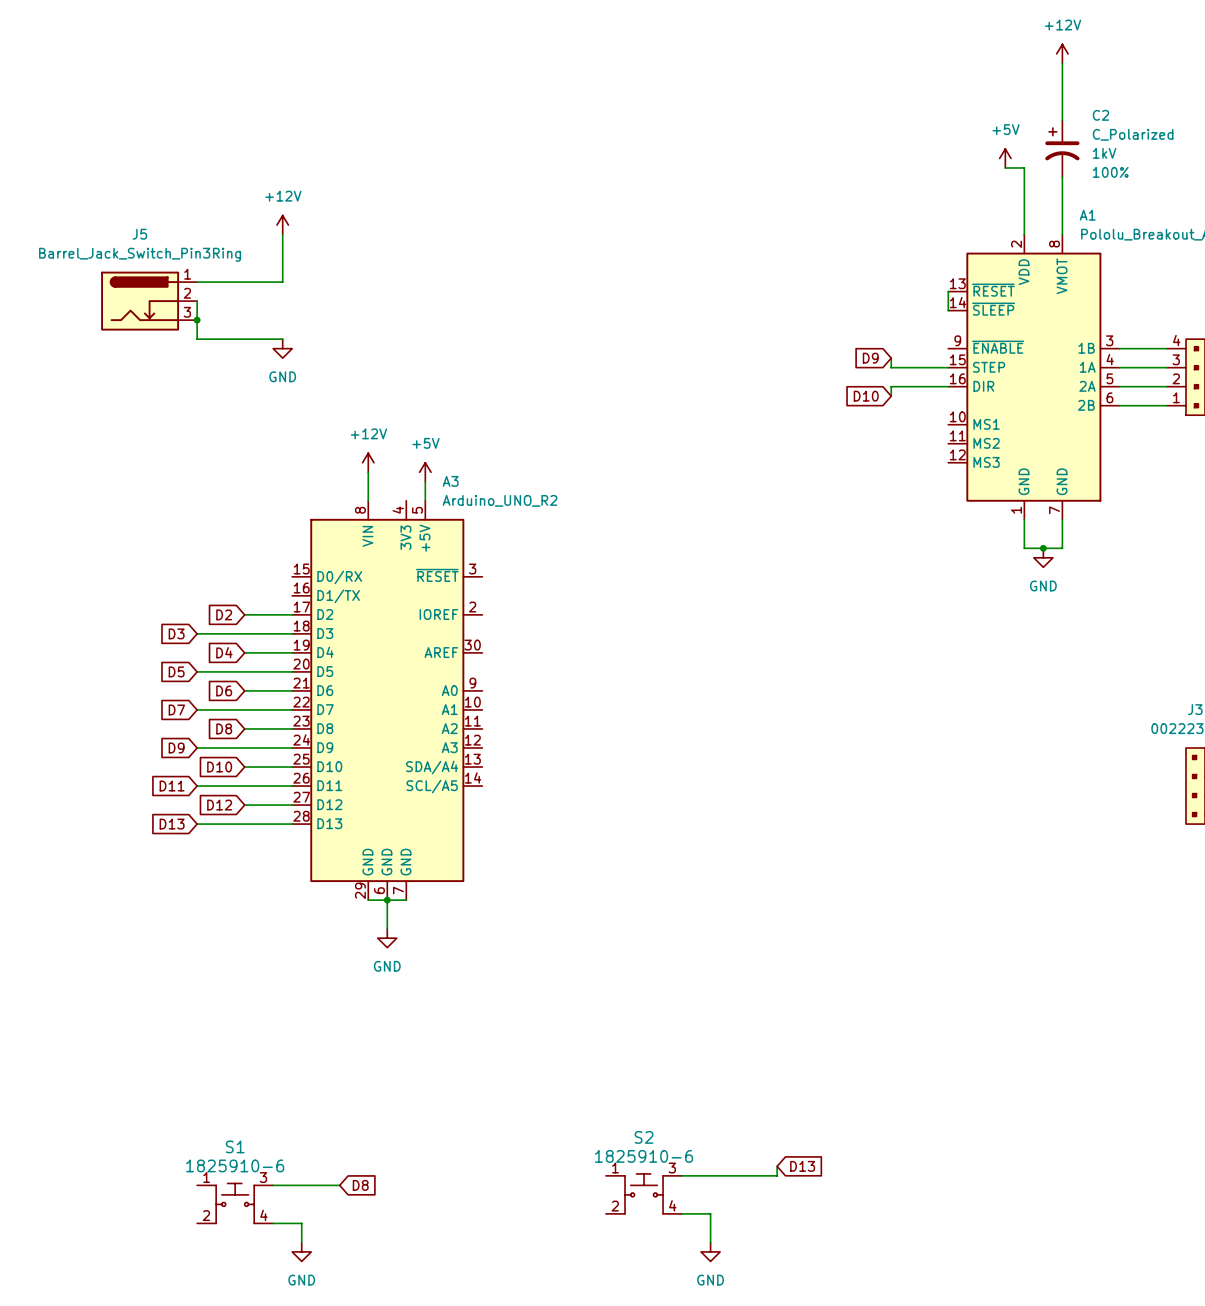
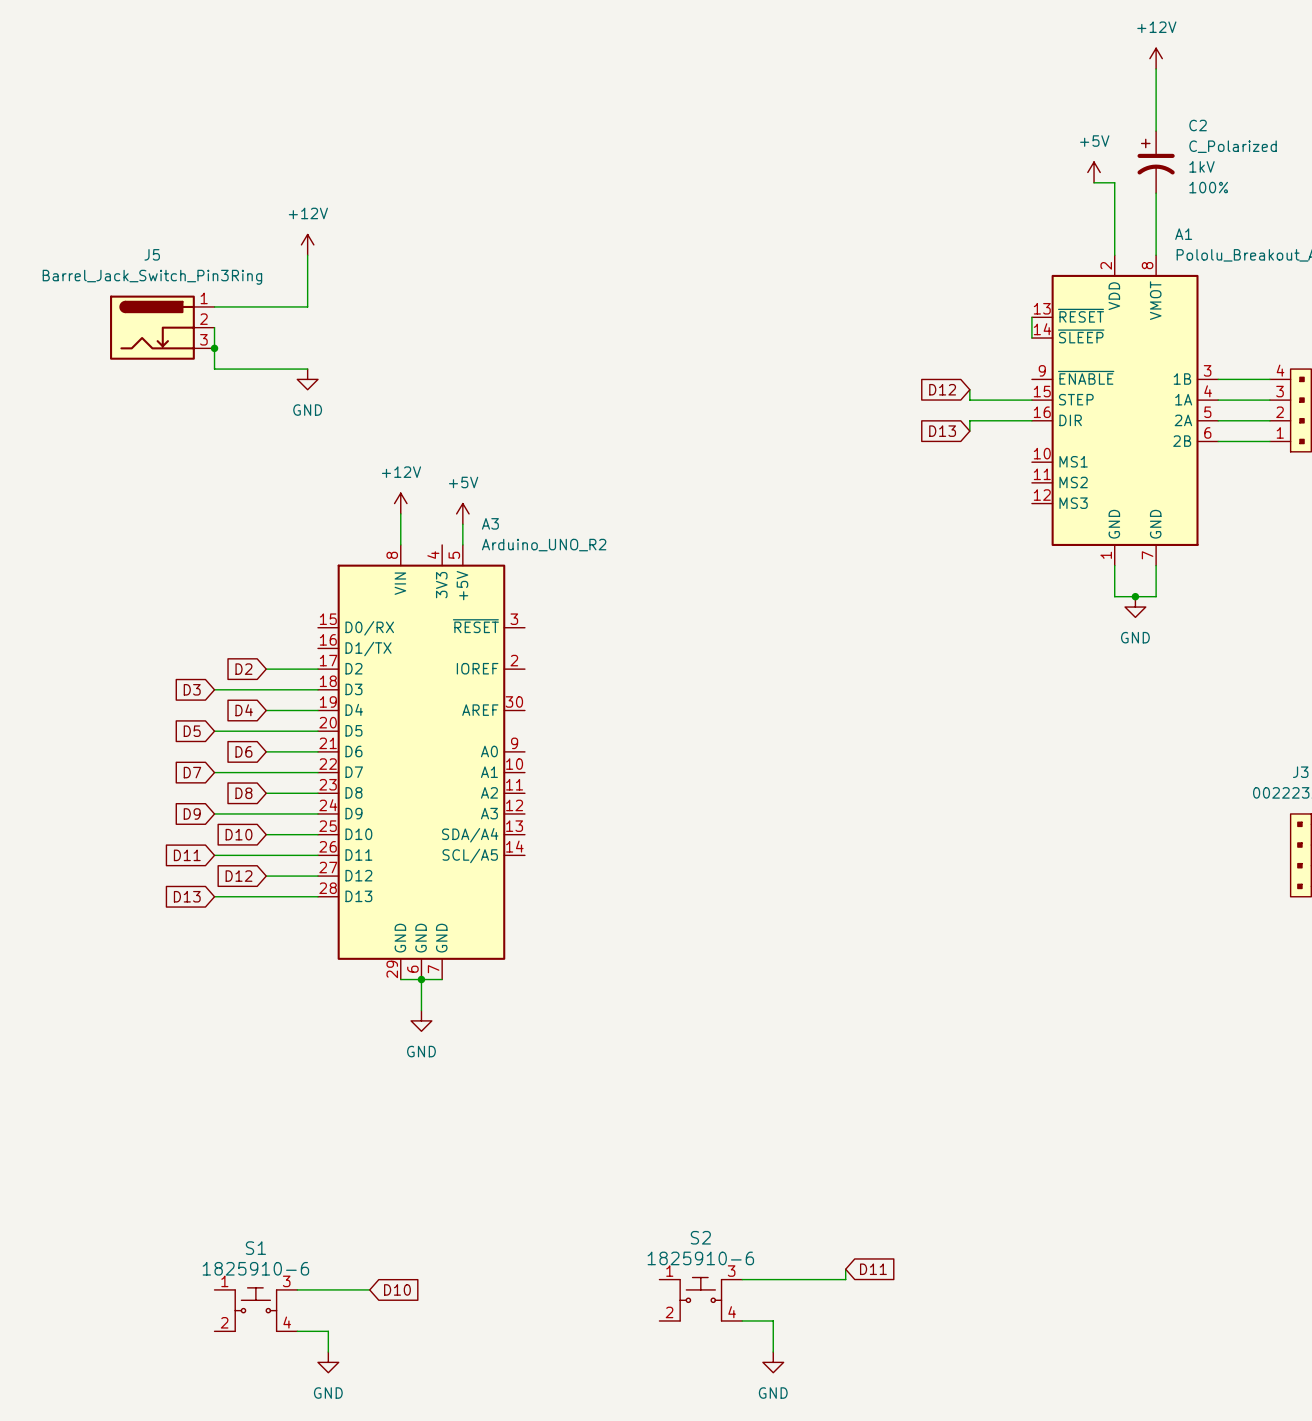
global label: D9 (870, 358) -> D12 (942, 389)
global label: D10 (866, 396) -> D13 (942, 431)
global label: D13 (802, 1166) -> D11 (873, 1269)
global label: D8 (360, 1185) -> D10 (397, 1289)

